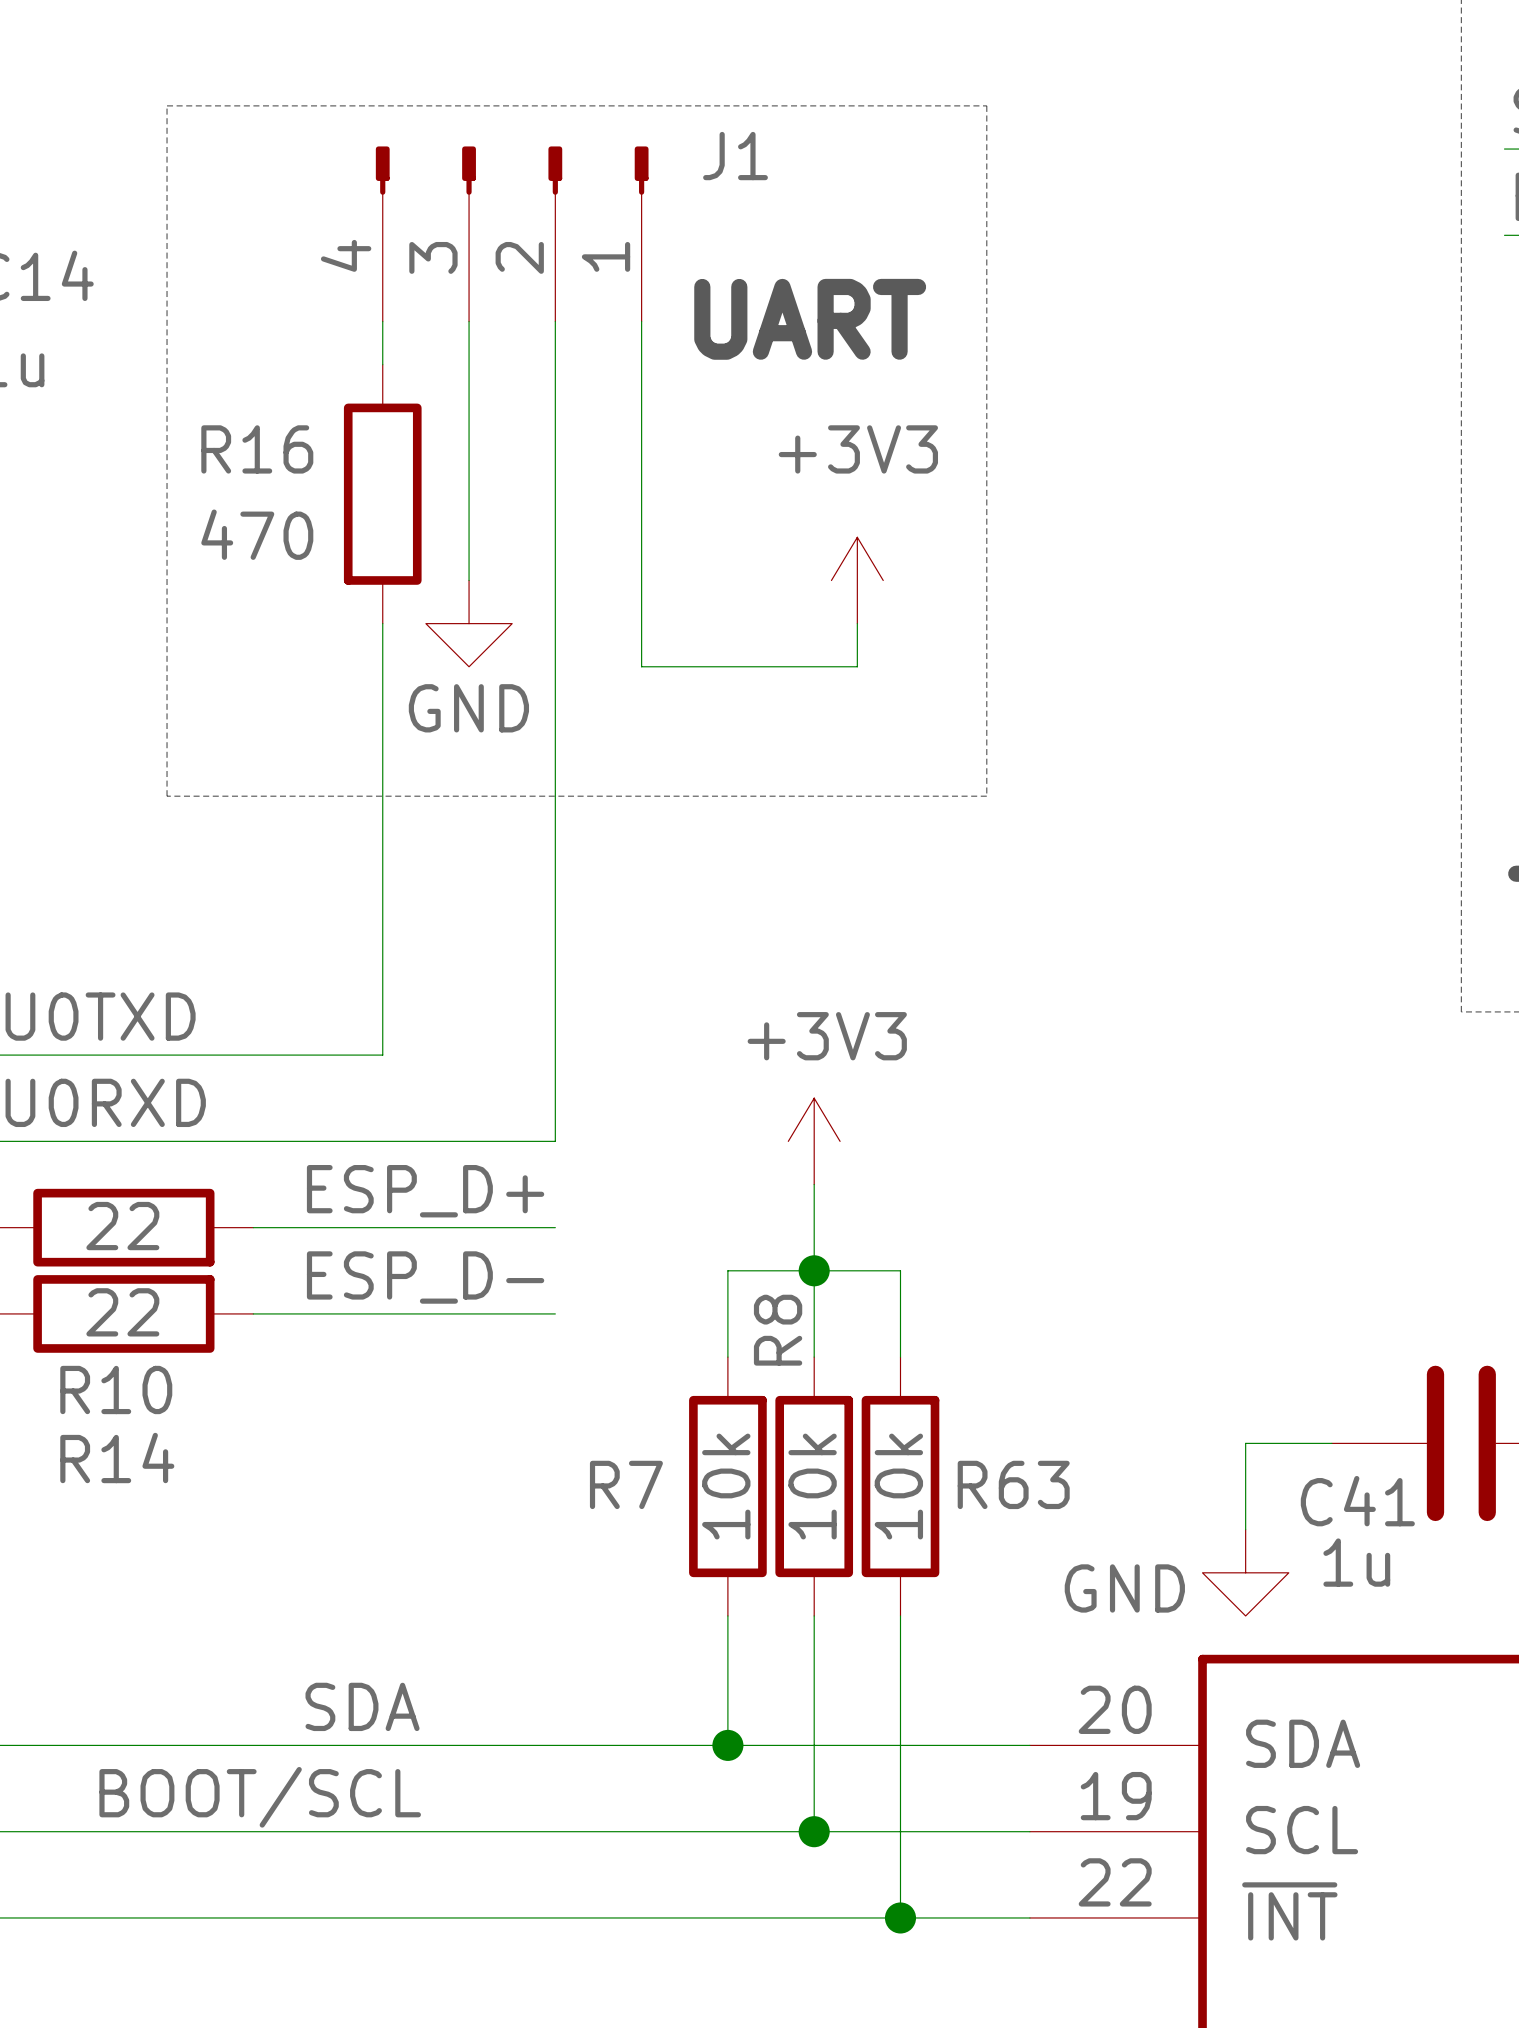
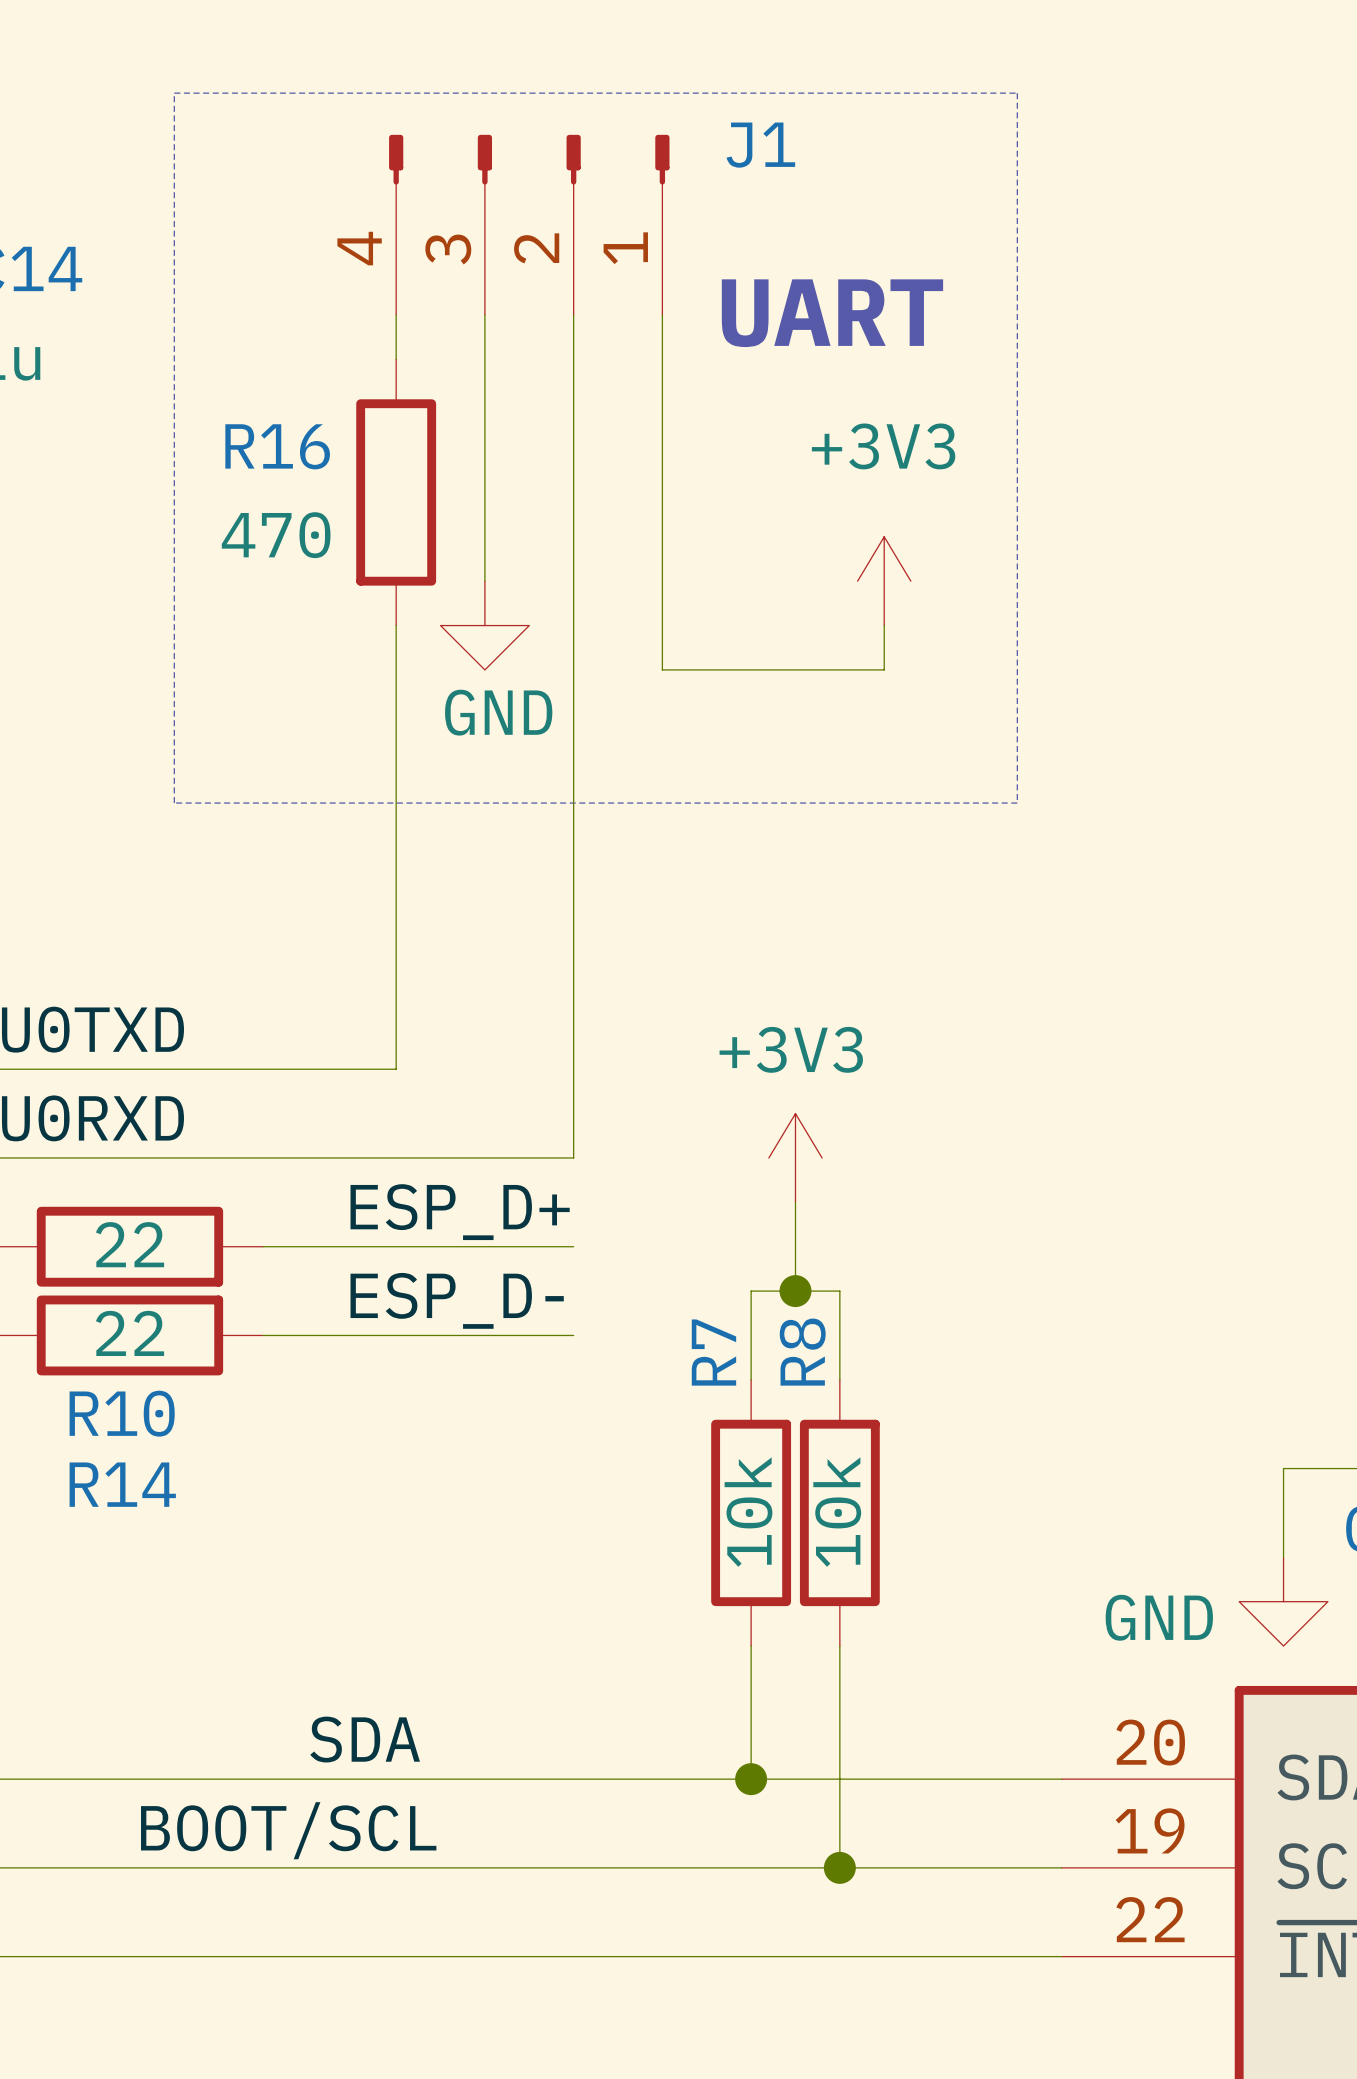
power symbol position: +3V3 (814, 1141) -> +3V3 (795, 1157)
wire: none -> (795, 1202) (795, 1291)
wire: (814, 1184) (814, 1270) (900, 1270) (900, 1357) -> none
junction position: (814, 1270) -> (795, 1291)
R7 name rotation: 0° (626, 1484) -> 90° counterclockwise (713, 1352)
R7 name position: R7 (626, 1484) -> R7 (713, 1352)
R63: 10k (900, 1486) -> none
wire: (900, 1615) (900, 1917) -> none
junction: (900, 1917) -> none

